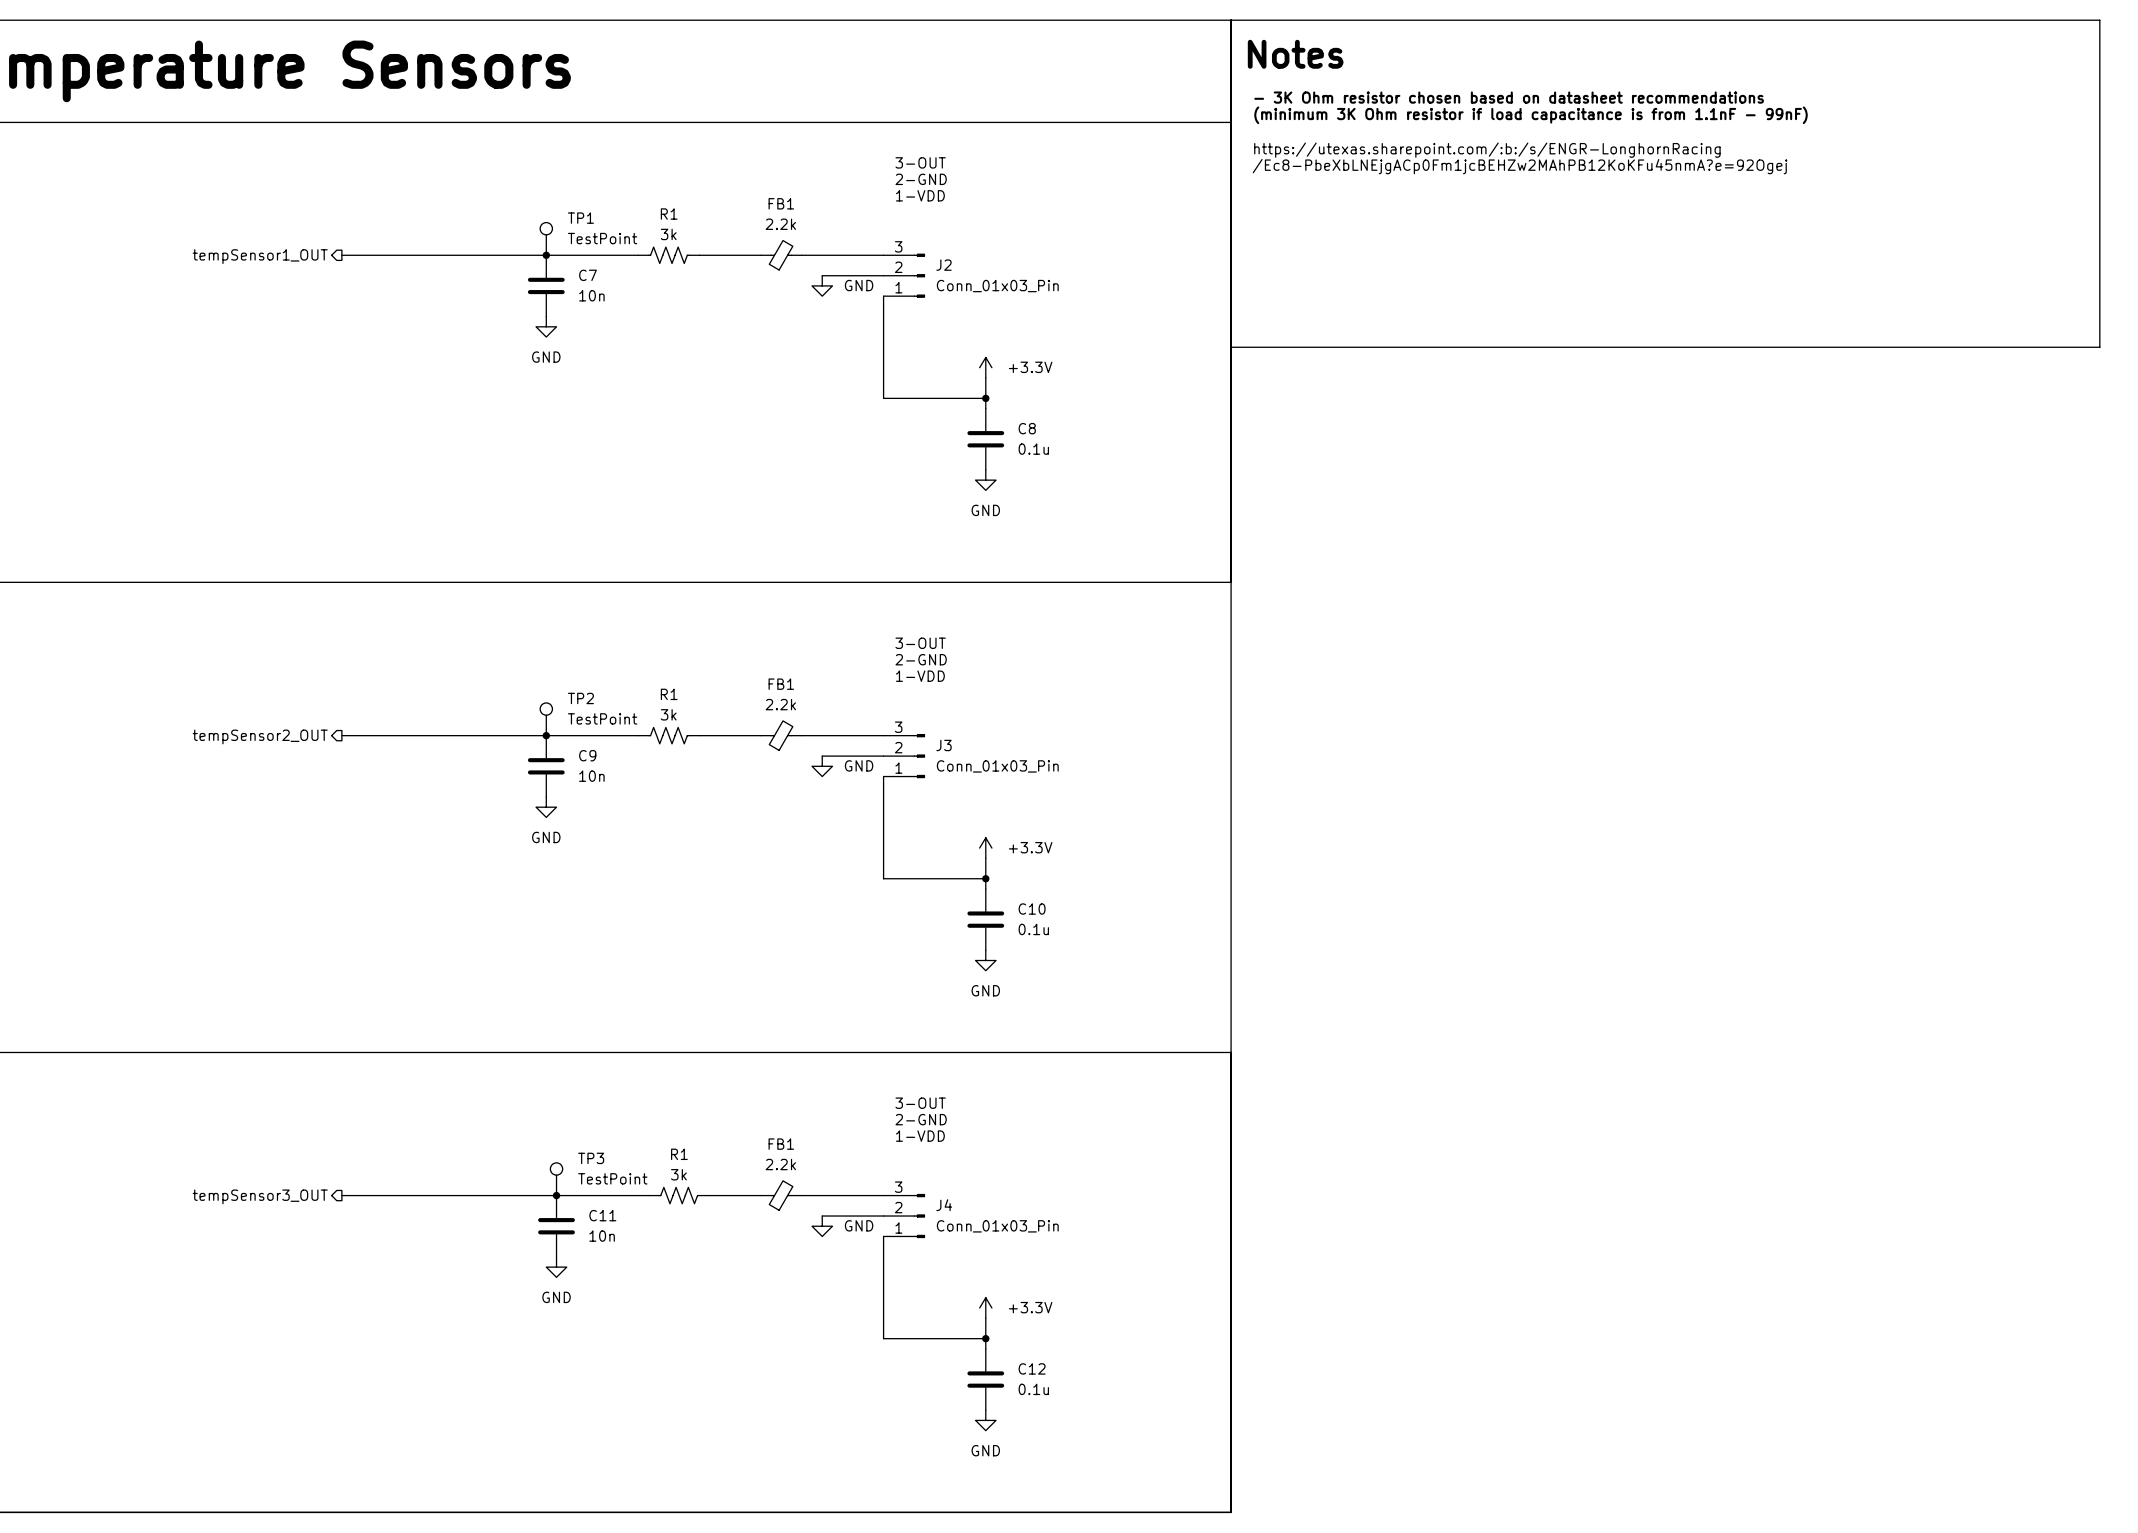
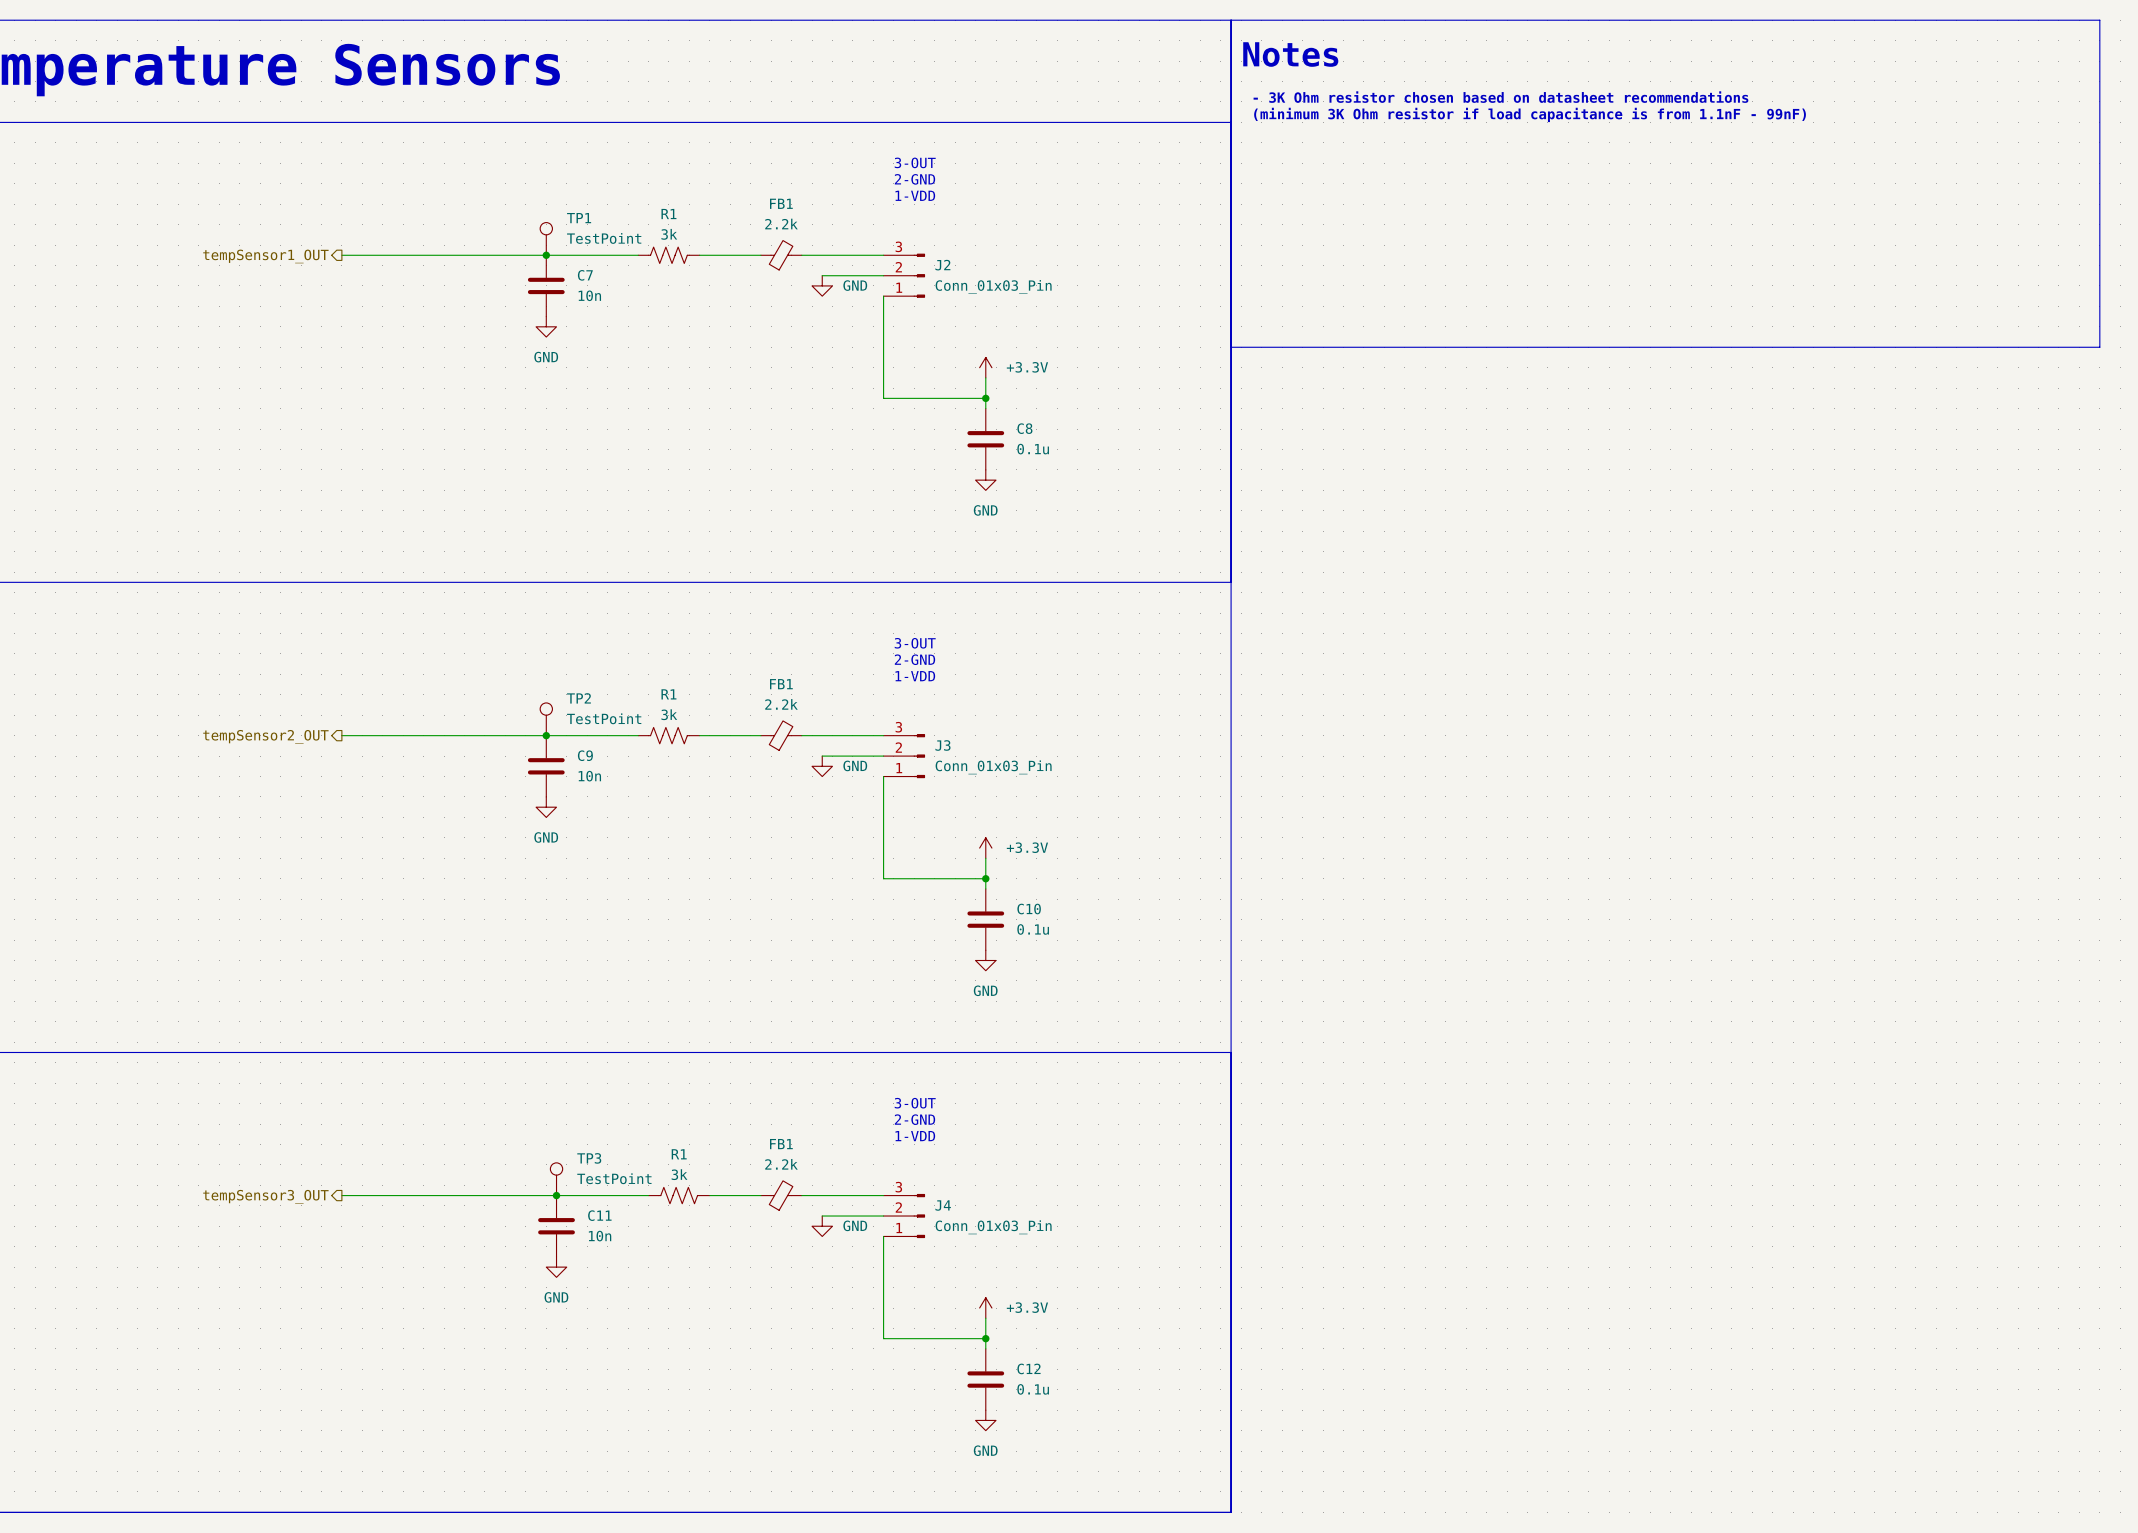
text: https://utexas.sharepoint.com/:b:/s/ENGR-LonghornRacing (1487, 150) -> none
text: /Ec8-PbeXbLNEjgACp0Fm1jcBEHZw2MAhPB12KoKFu45nmA?e=92Ogej (1520, 166) -> none

